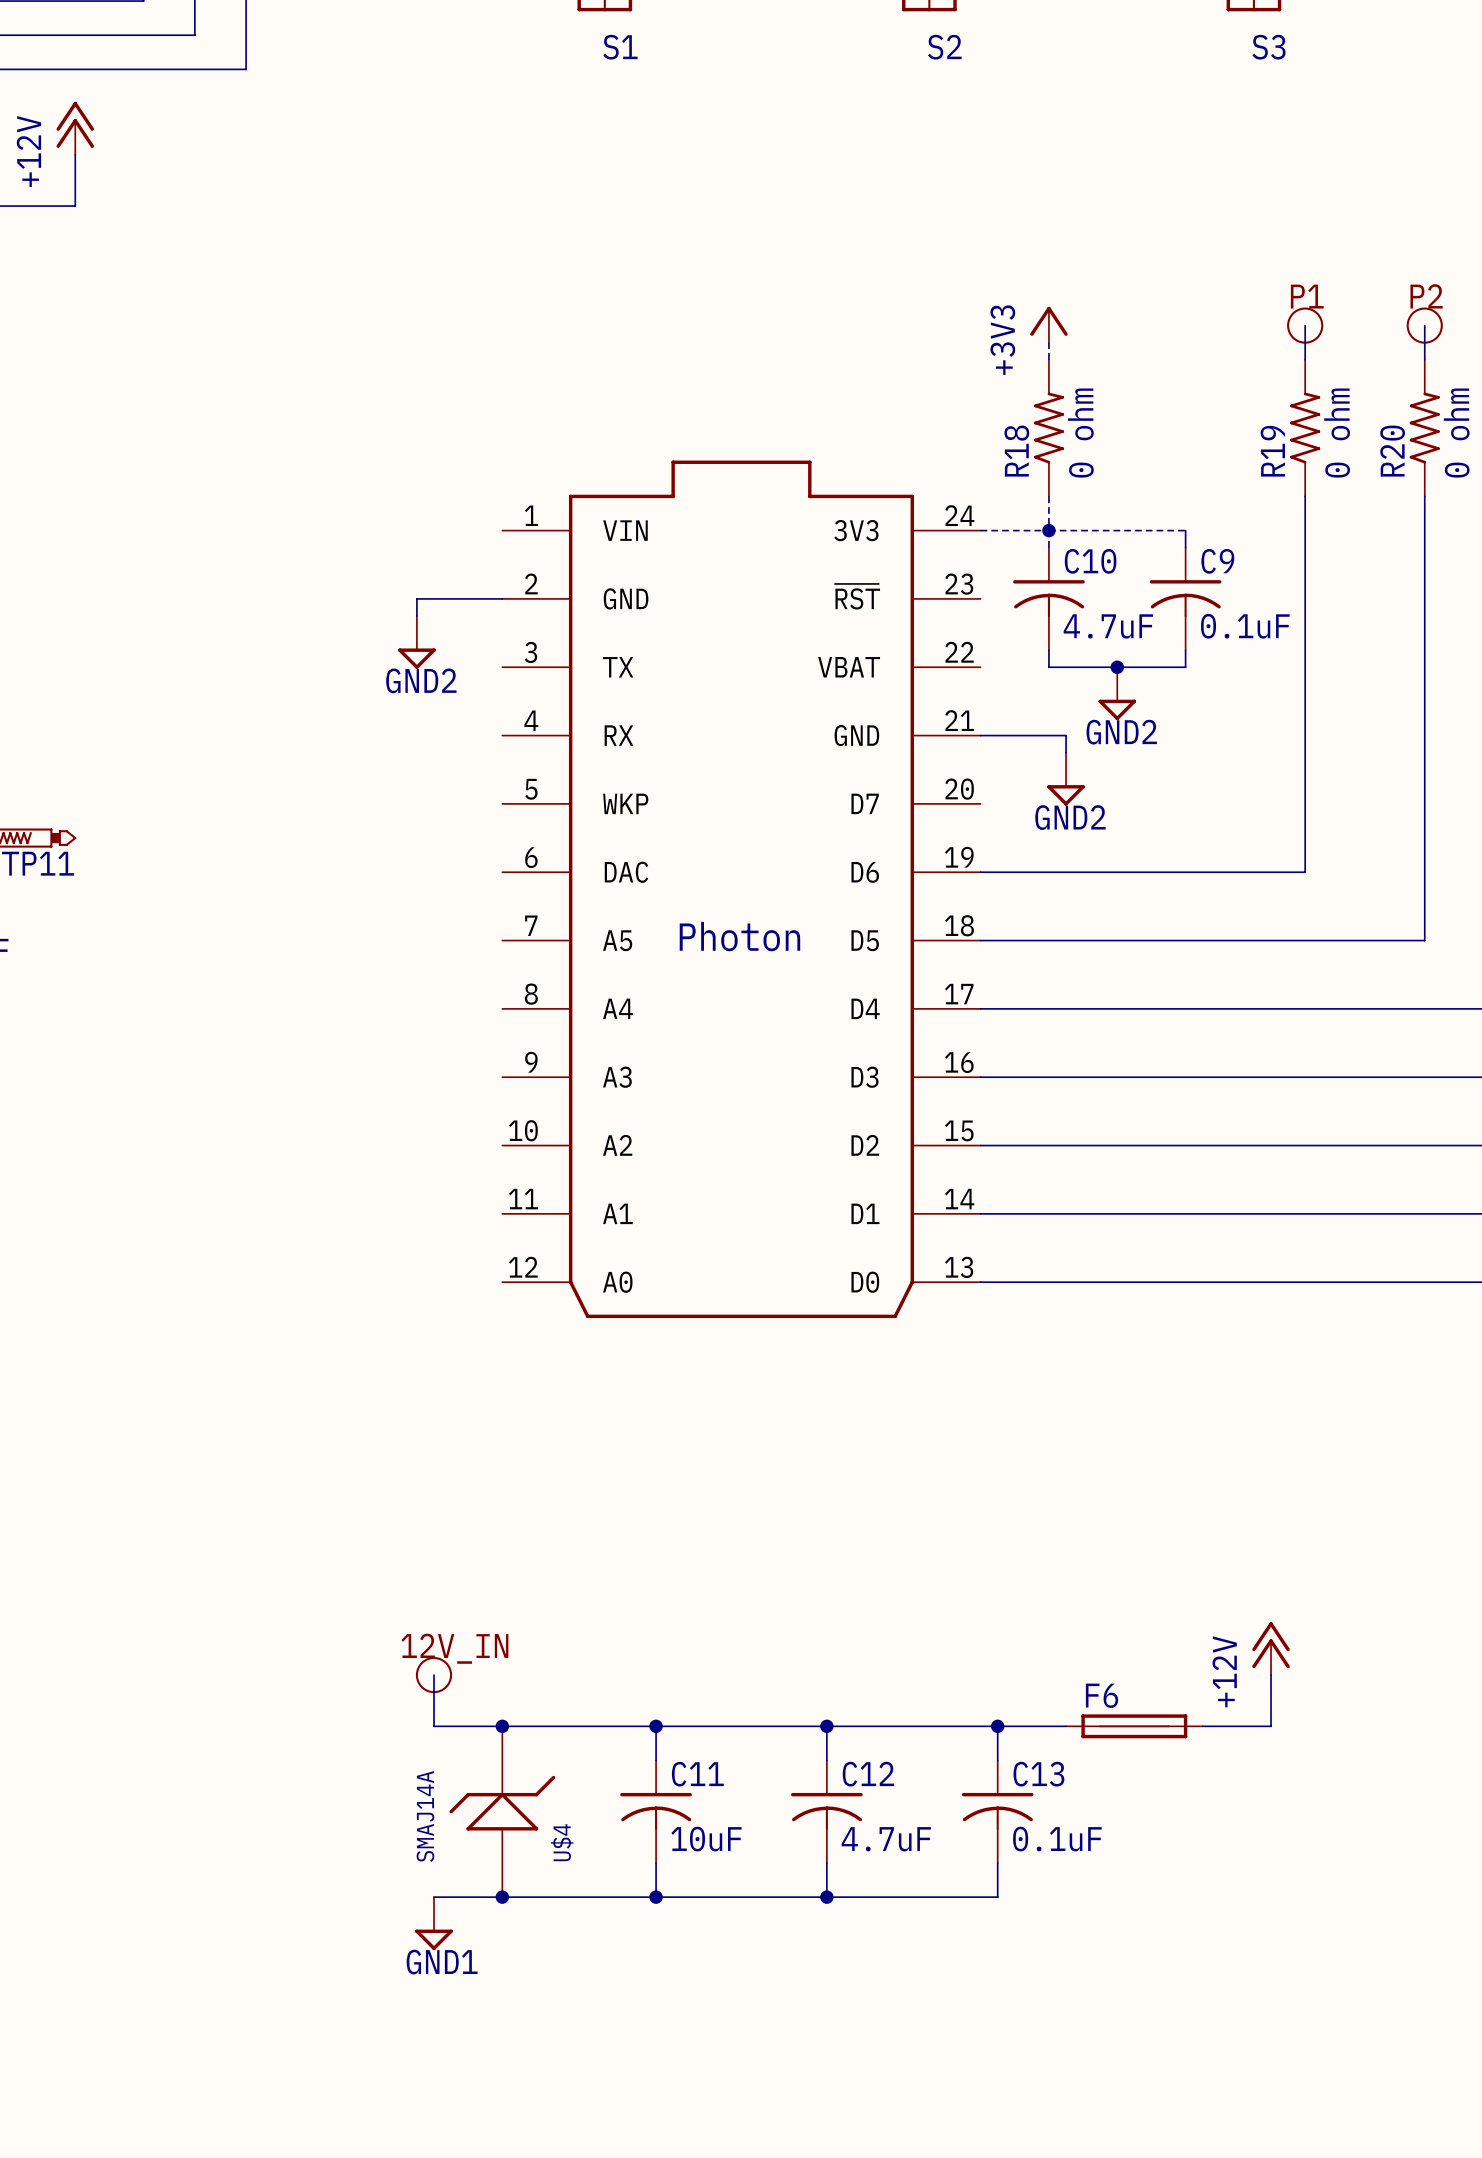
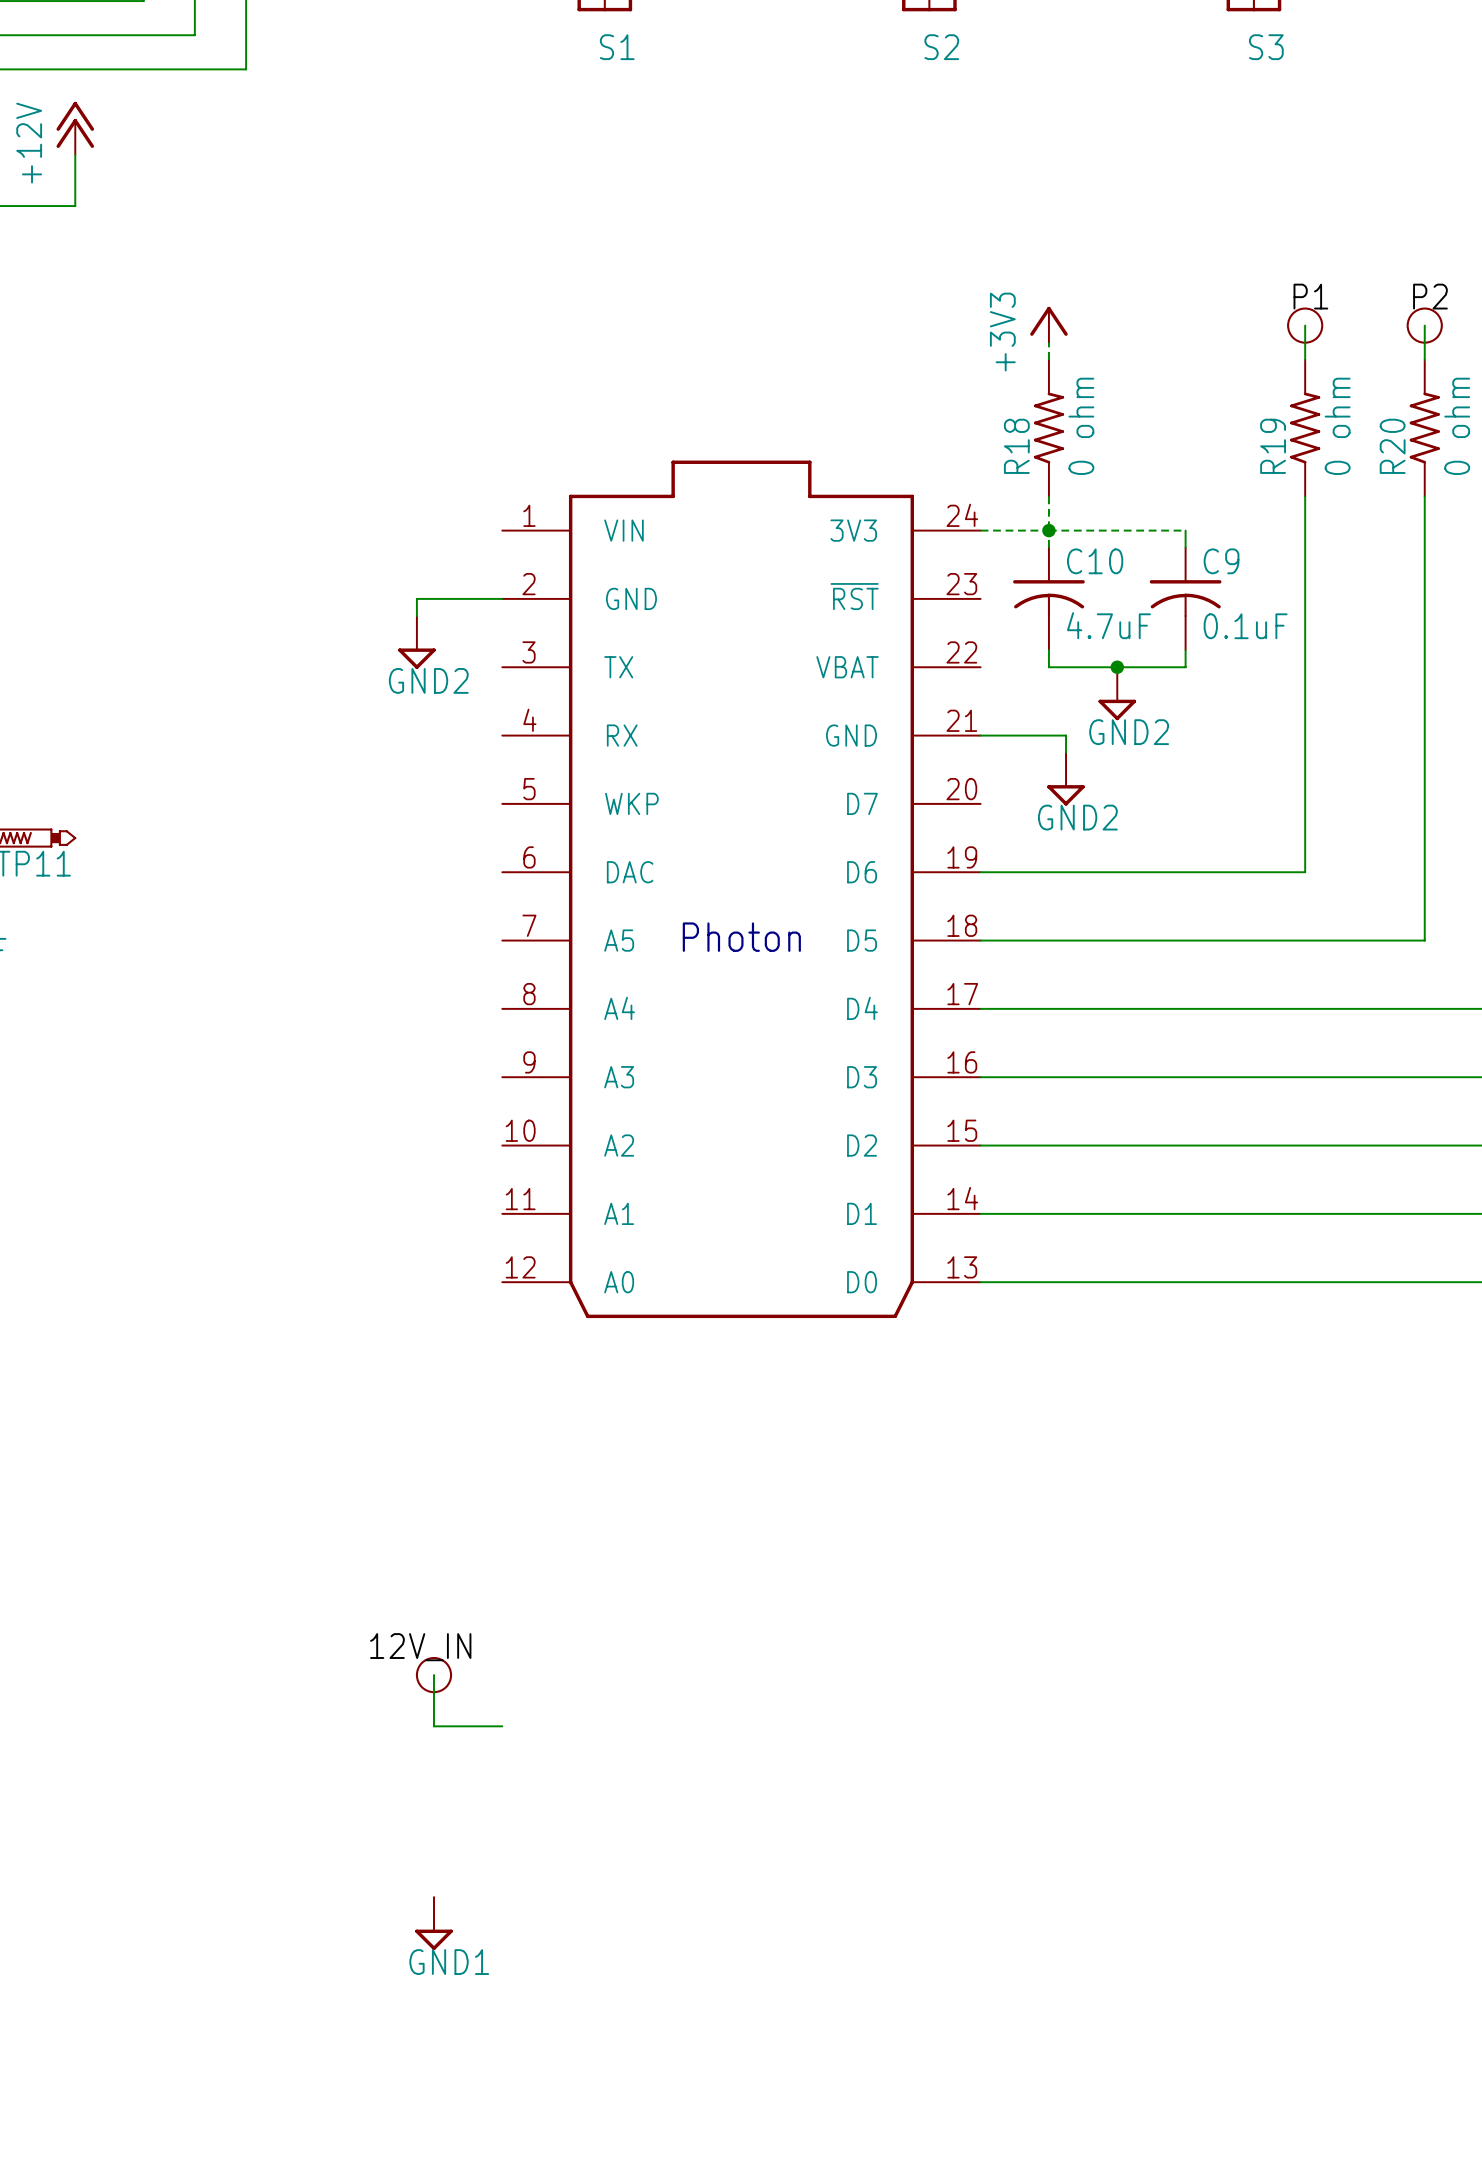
label position: 12V_IN (454, 1648) -> 12V_IN (420, 1647)
power symbol: +12V (1271, 1648) -> none
wire: (1271, 1675) (1271, 1726) (1202, 1726) -> none
wire: (502, 1726) (1066, 1726) -> none
junction: (502, 1726) -> none
wire: (656, 1726) (656, 1760) -> none
junction: (656, 1726) -> none
wire: (826, 1726) (826, 1760) -> none
junction: (826, 1726) -> none
wire: (997, 1726) (997, 1760) -> none
junction: (997, 1726) -> none
F6: (1134, 1726) -> none
U$4: SMAJ14A (502, 1811) -> none
C11: 10uF (656, 1811) -> none
C12: 4.7uF (826, 1811) -> none
C13: 0.1uF (997, 1811) -> none
wire: (656, 1862) (656, 1897) -> none
wire: (826, 1862) (826, 1897) -> none
wire: (997, 1862) (997, 1897) (434, 1897) -> none
junction: (502, 1897) -> none
junction: (656, 1897) -> none
junction: (826, 1897) -> none

